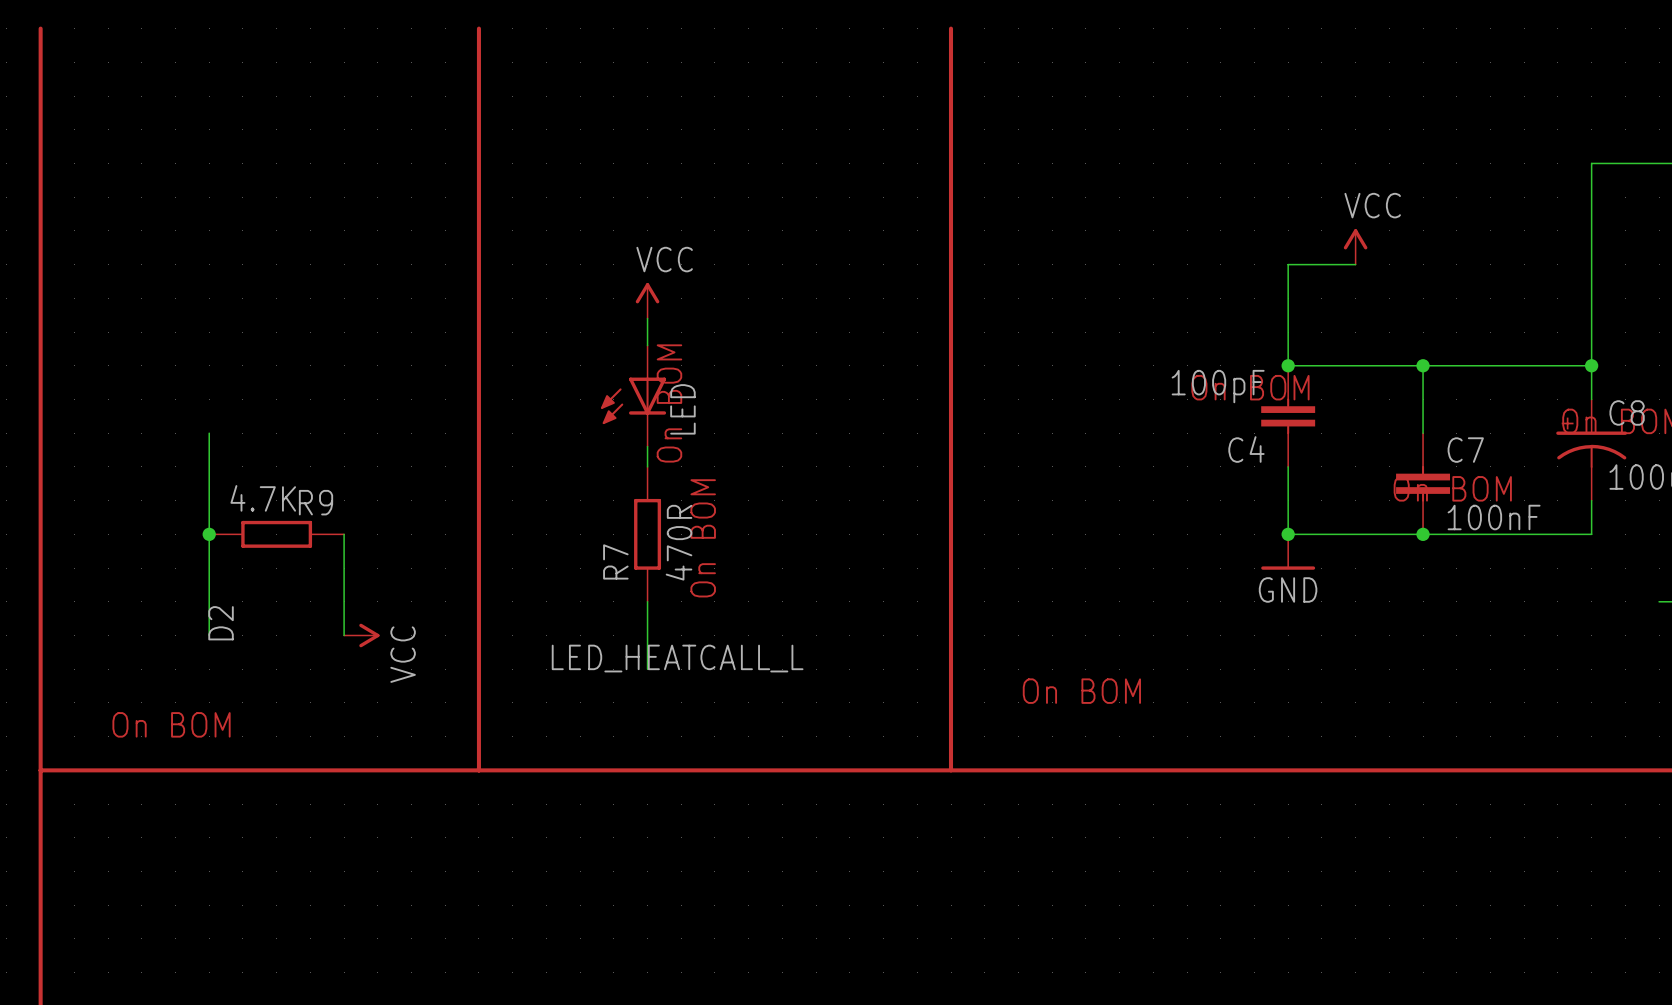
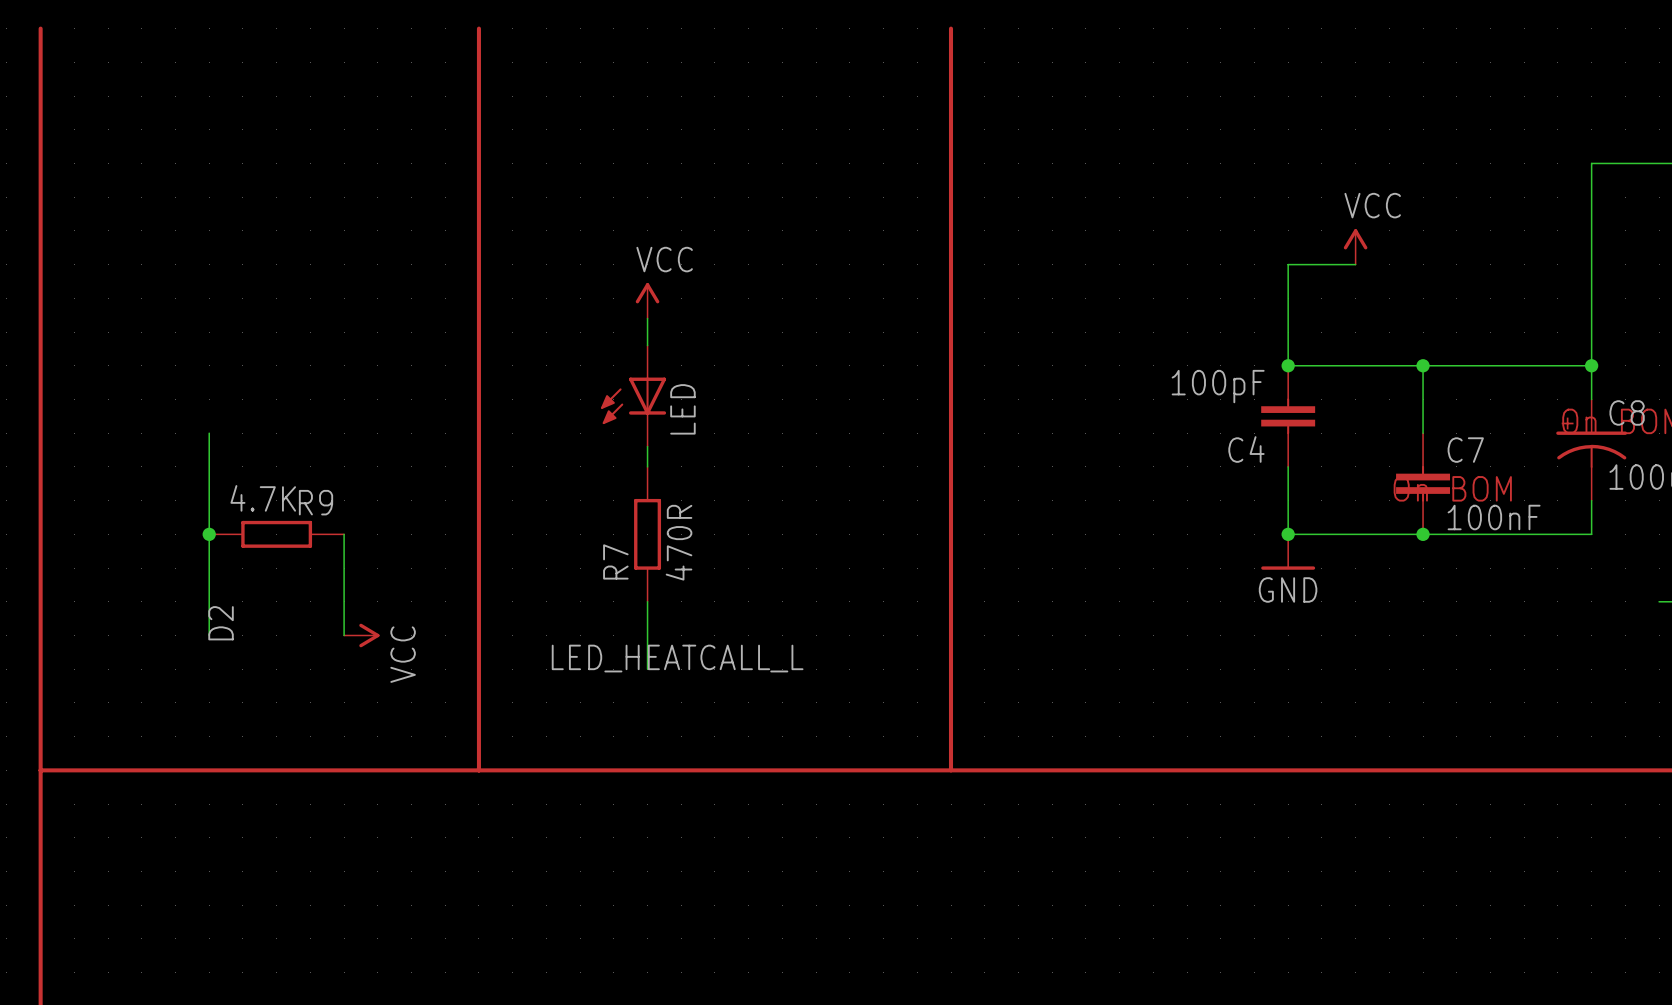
text: On BOM (1250, 387) -> none
text: On BOM (669, 403) -> none
text: On BOM (703, 538) -> none
text: On BOM (1081, 691) -> none
text: On BOM (171, 724) -> none

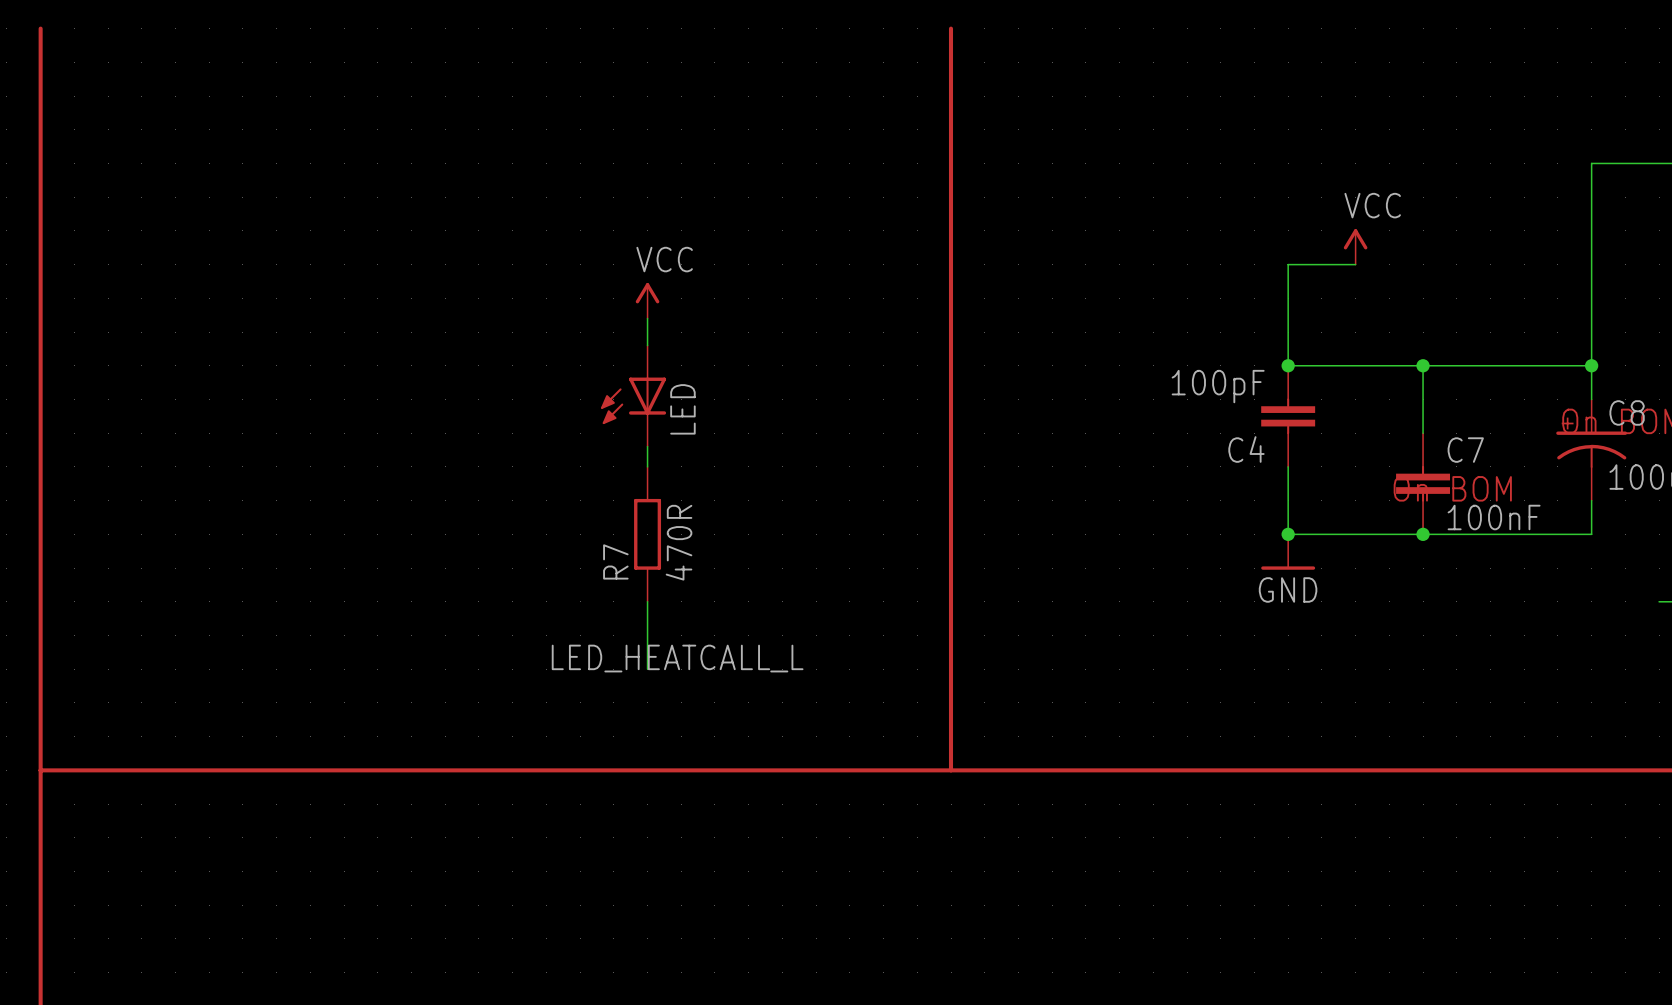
line: (478, 28) (478, 770) -> none
wire: (209, 433) (209, 635) -> none
junction: (209, 534) -> none
R9: 4.7K (276, 534) -> none
wire: (344, 534) (344, 635) -> none
label: D2 (221, 623) -> none
power symbol: VCC (361, 635) -> none

